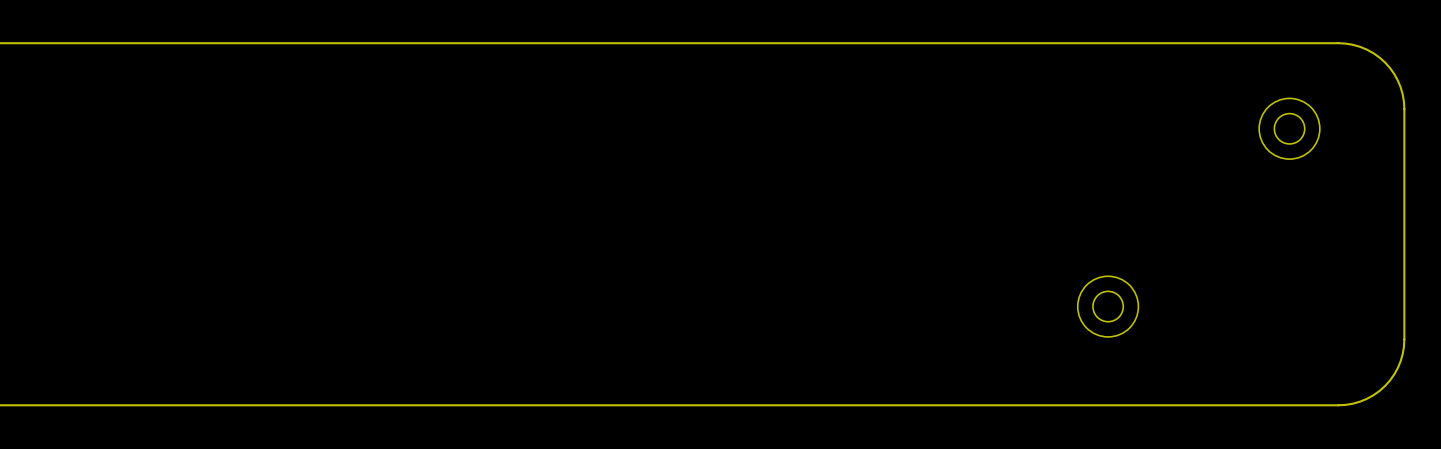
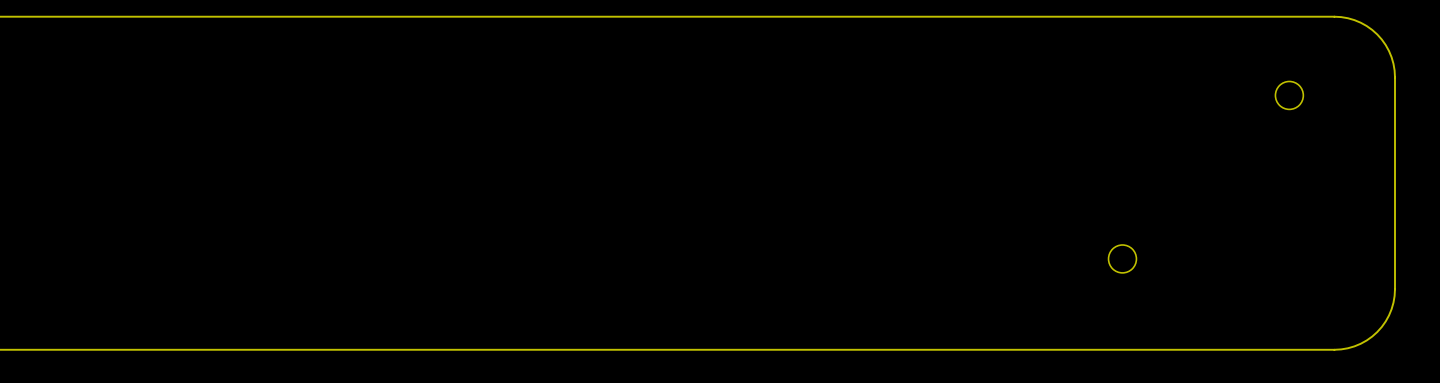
round board edge: [1258, 97, 1321, 160] -> none
round board edge: [1077, 275, 1140, 338] -> none

